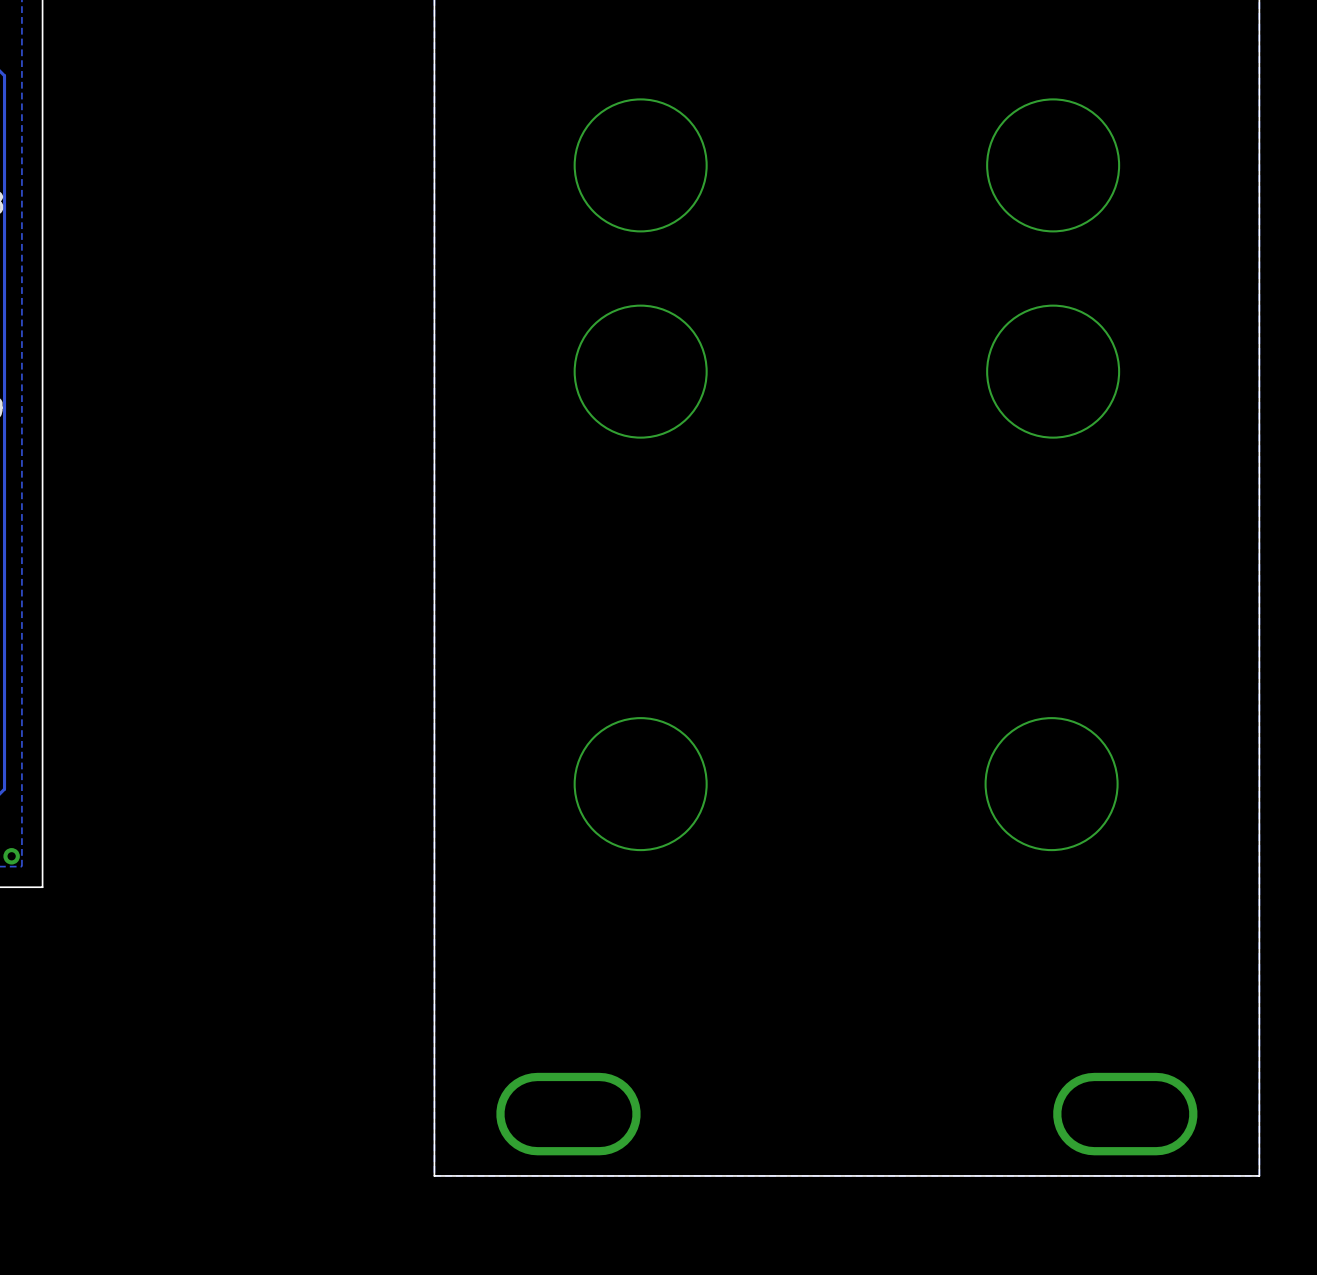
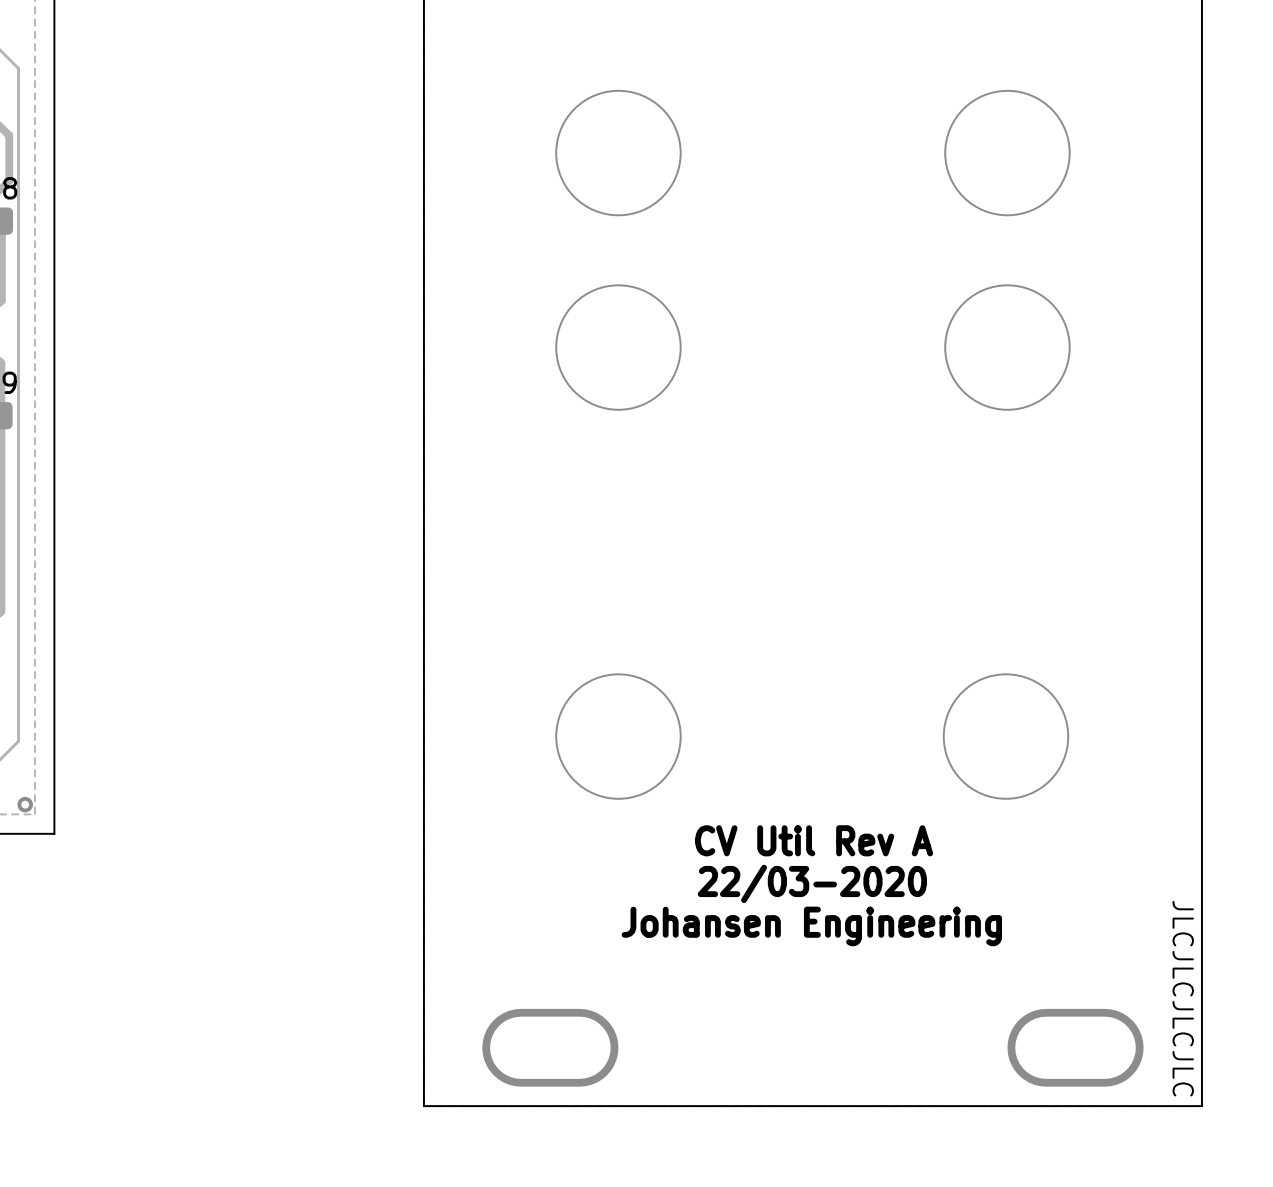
text: none -> CV Util Rev A (814, 840)
text: none -> 22/03-2020 (812, 883)
text: none -> Johansen Engineering (811, 926)
text: none -> JLCJLCJLCJLC (1183, 998)

